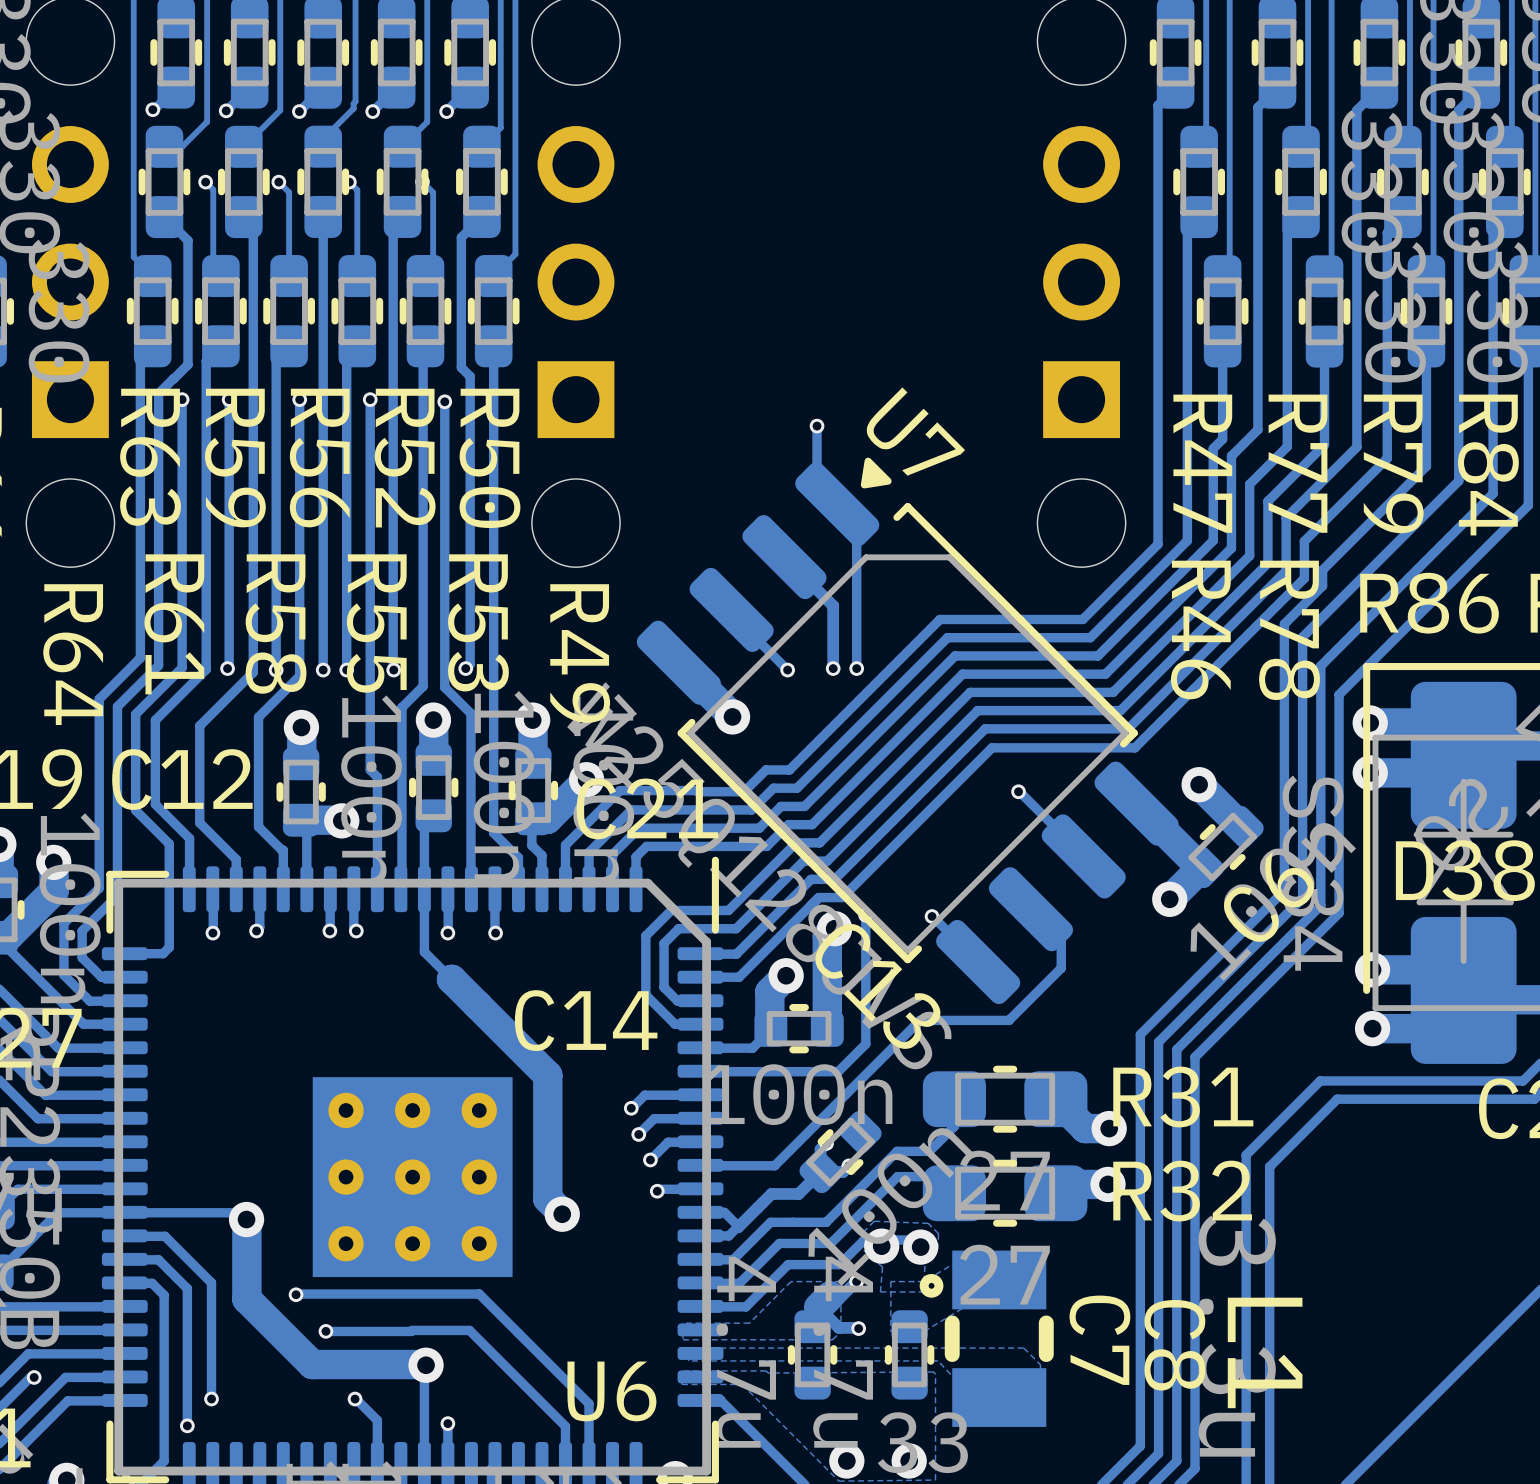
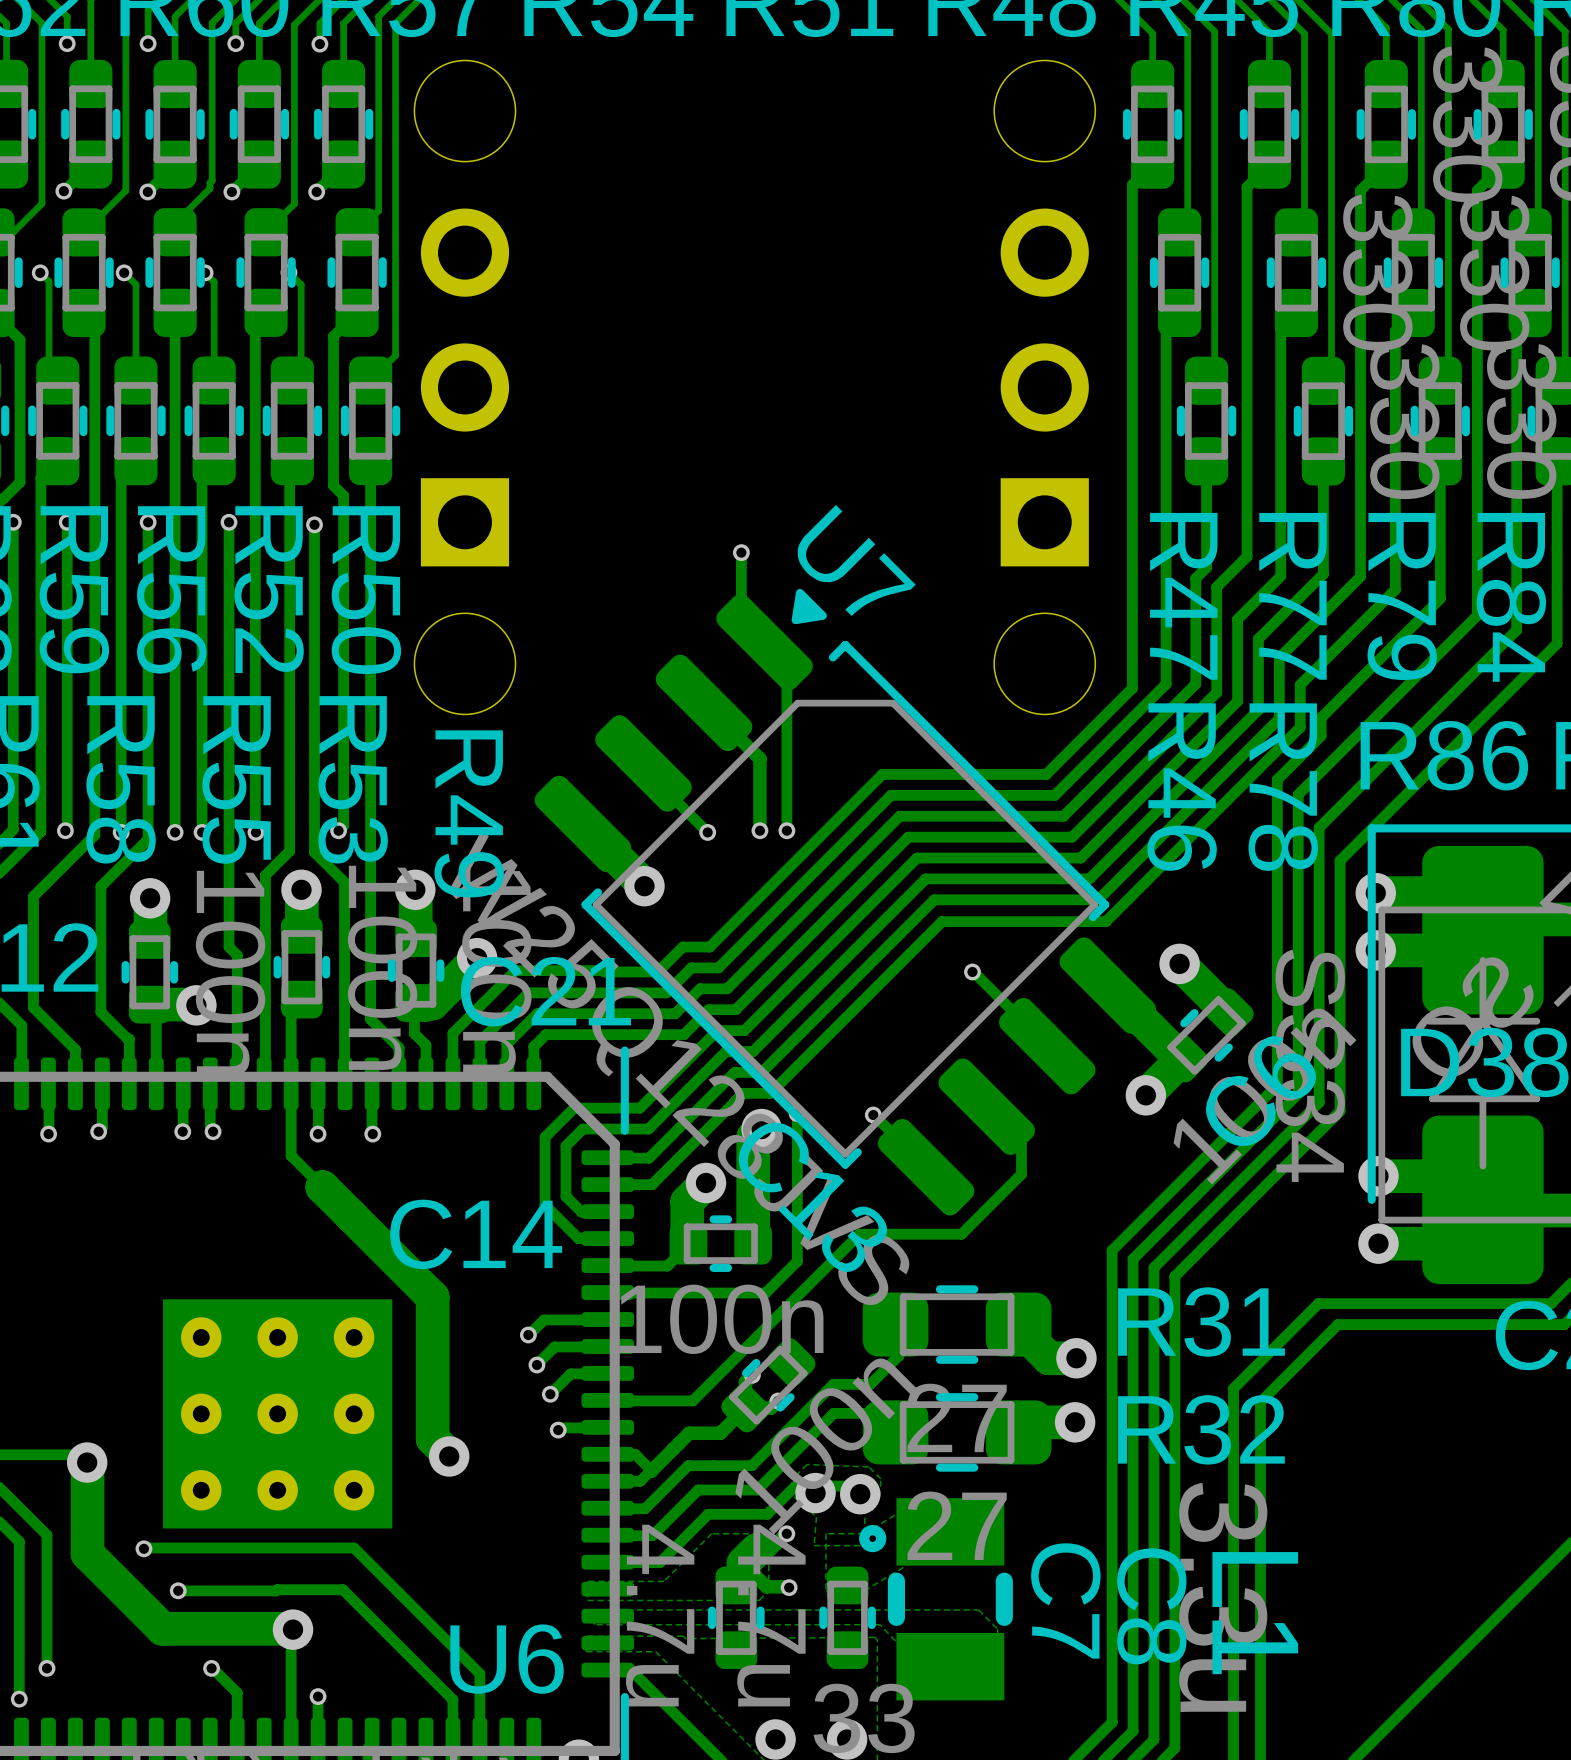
R31 footprint: [922, 1065, 1088, 1133] -> [862, 1285, 1052, 1364]
R31 name position: R31 (1183, 1097) -> R31 (1201, 1322)
R32 footprint: [922, 1159, 1088, 1227] -> [862, 1393, 1052, 1472]
R32 name position: R32 (1182, 1191) -> R32 (1201, 1429)

